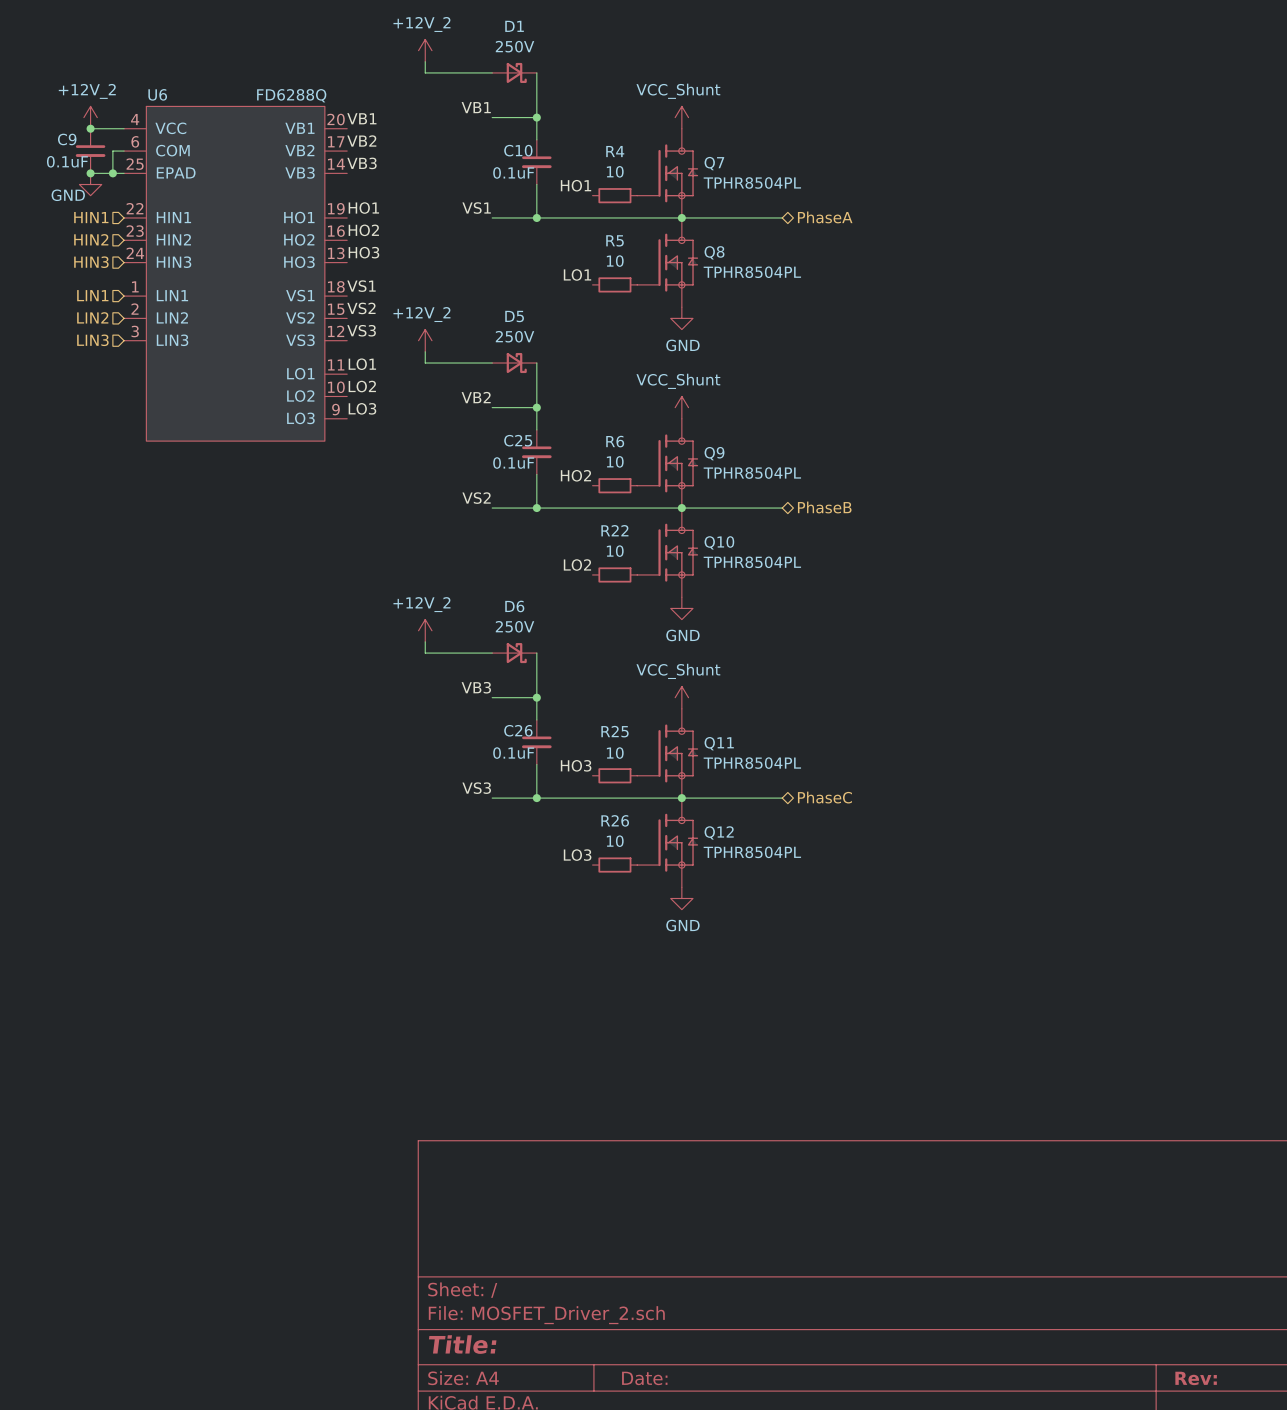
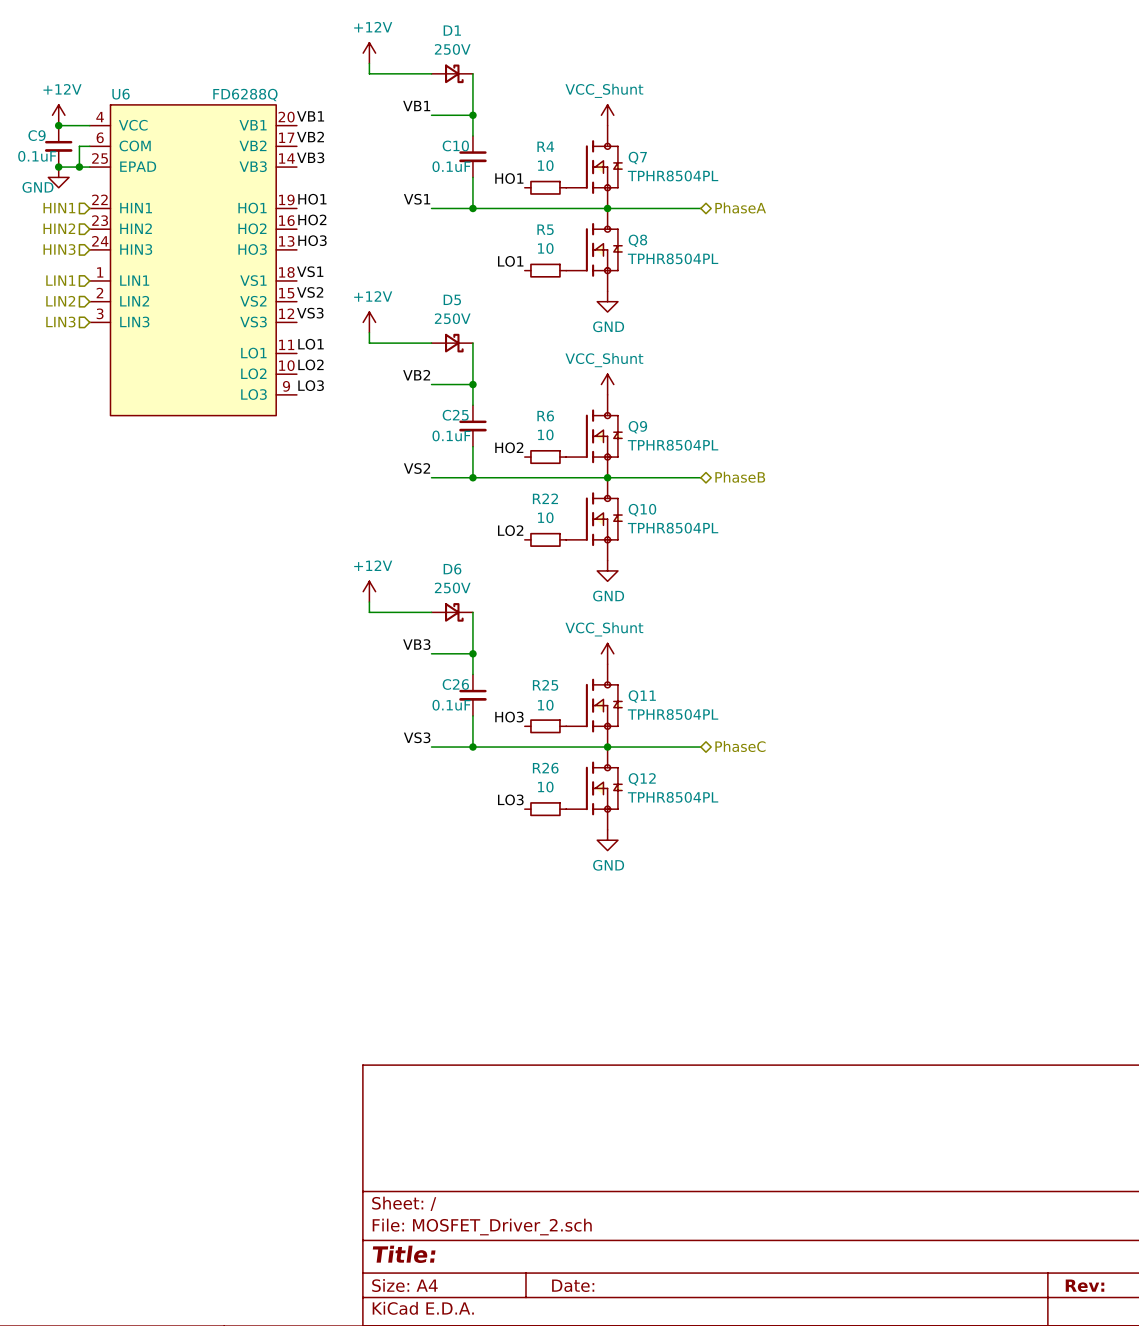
power symbol: +12V_2 (425, 50) -> +12V (369, 53)
power symbol: +12V_2 (90, 117) -> +12V (58, 115)
power symbol: +12V_2 (425, 340) -> +12V (369, 322)
power symbol: +12V_2 (425, 630) -> +12V (369, 591)

